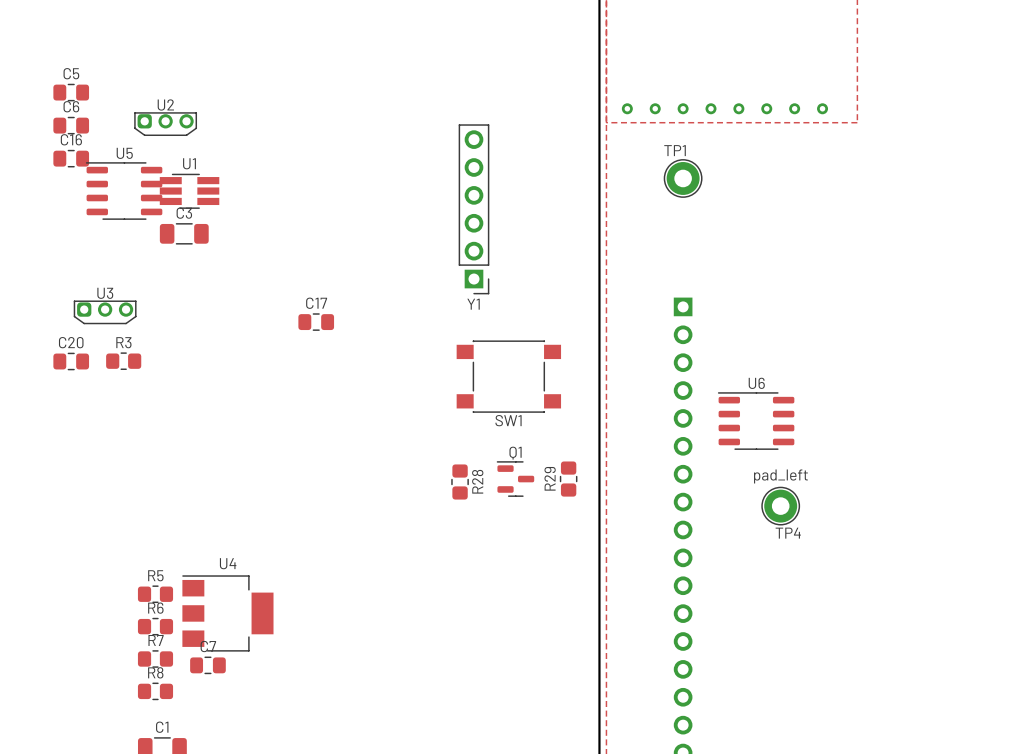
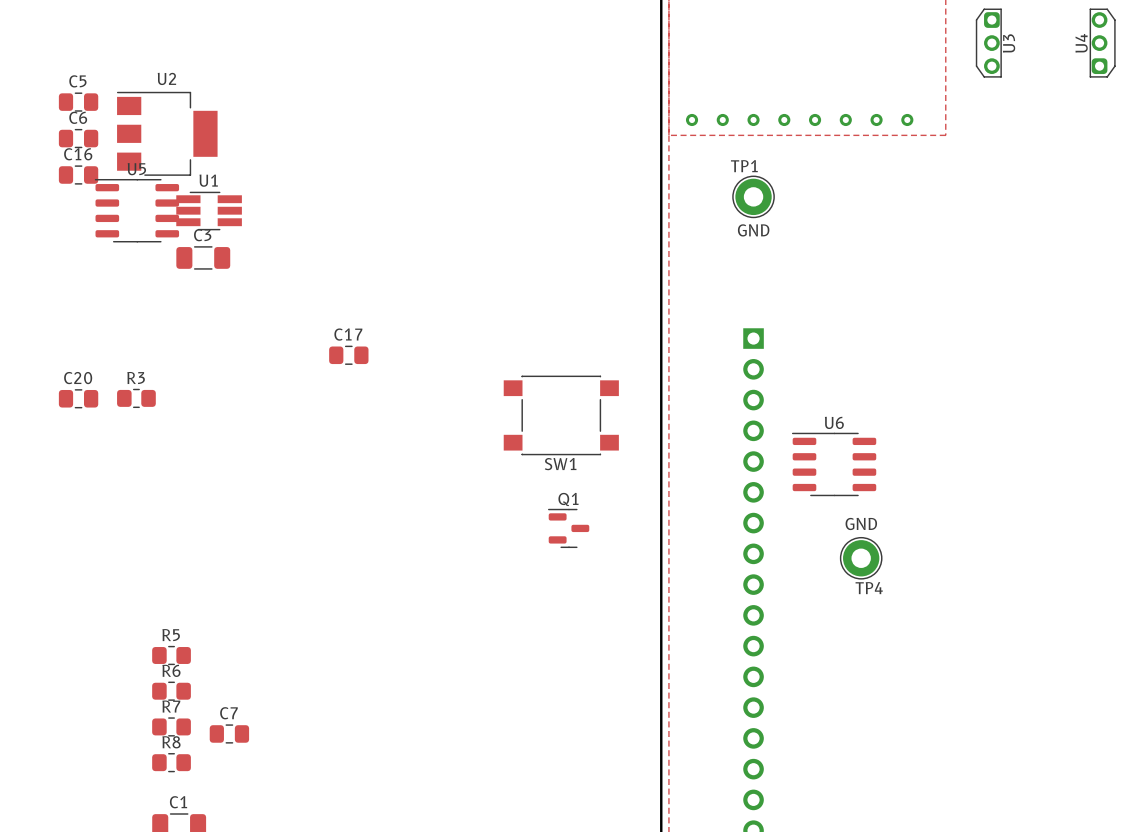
U2 name position: U2 (165, 104) -> U2 (166, 78)
U2 footprint: [134, 112, 197, 136] -> [116, 91, 218, 176]
TP1 value: none -> GND (753, 230)
Y1: (473, 209) -> none
U3 rotation: 0° (105, 312) -> 90° clockwise (988, 43)
U3 position: (105, 312) -> (988, 43)
TP4 value: pad_left (780, 476) -> GND (861, 523)
R29: (568, 479) -> none
R28: (460, 482) -> none
U4 name position: U4 (228, 563) -> U4 (1081, 43)
U4 footprint: [182, 575, 274, 652] -> [1089, 8, 1116, 78]

